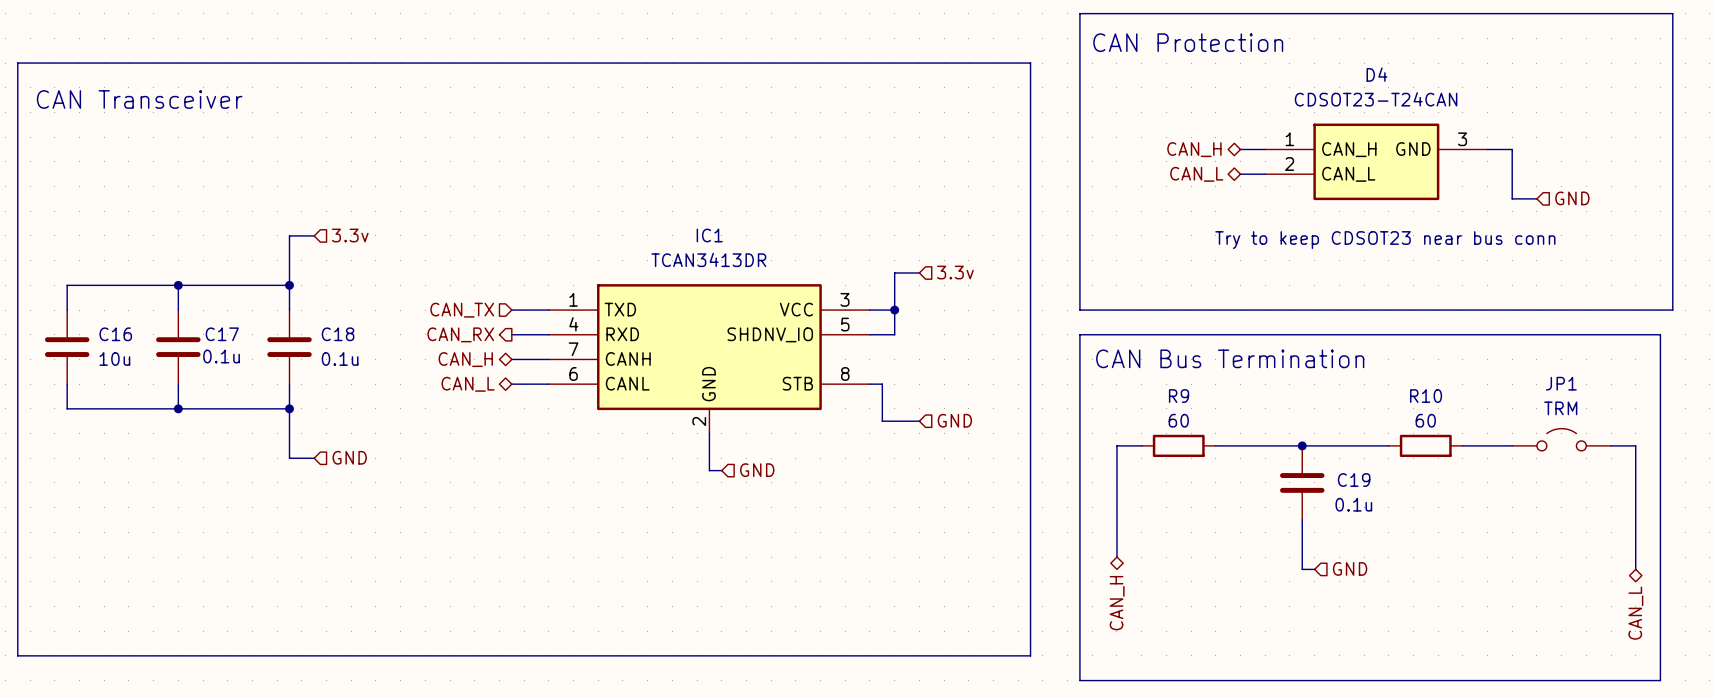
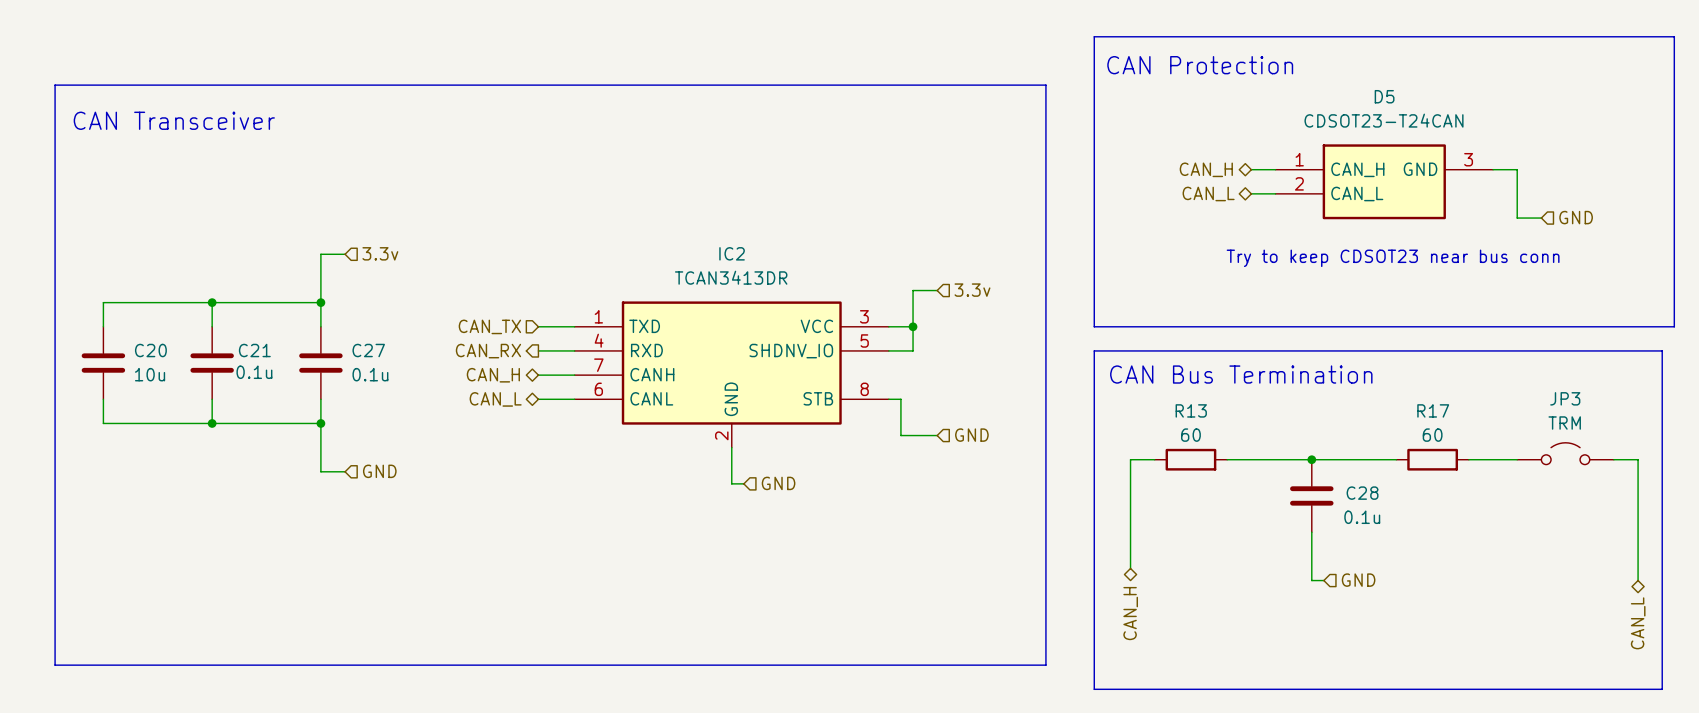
D4 name: D4 (1376, 74) -> D5 (1384, 96)
IC1 name: IC1 (709, 235) -> IC2 (732, 253)
C16 name: C16 (115, 334) -> C20 (150, 350)
C17 name: C17 (222, 334) -> C21 (254, 350)
C18 name: C18 (338, 334) -> C27 (368, 350)
JP1 name: JP1 (1561, 383) -> JP3 (1565, 398)
R9 name: R9 (1179, 396) -> R13 (1191, 410)
R10 name: R10 (1426, 396) -> R17 (1433, 410)
C19 name: C19 (1354, 480) -> C28 (1362, 493)

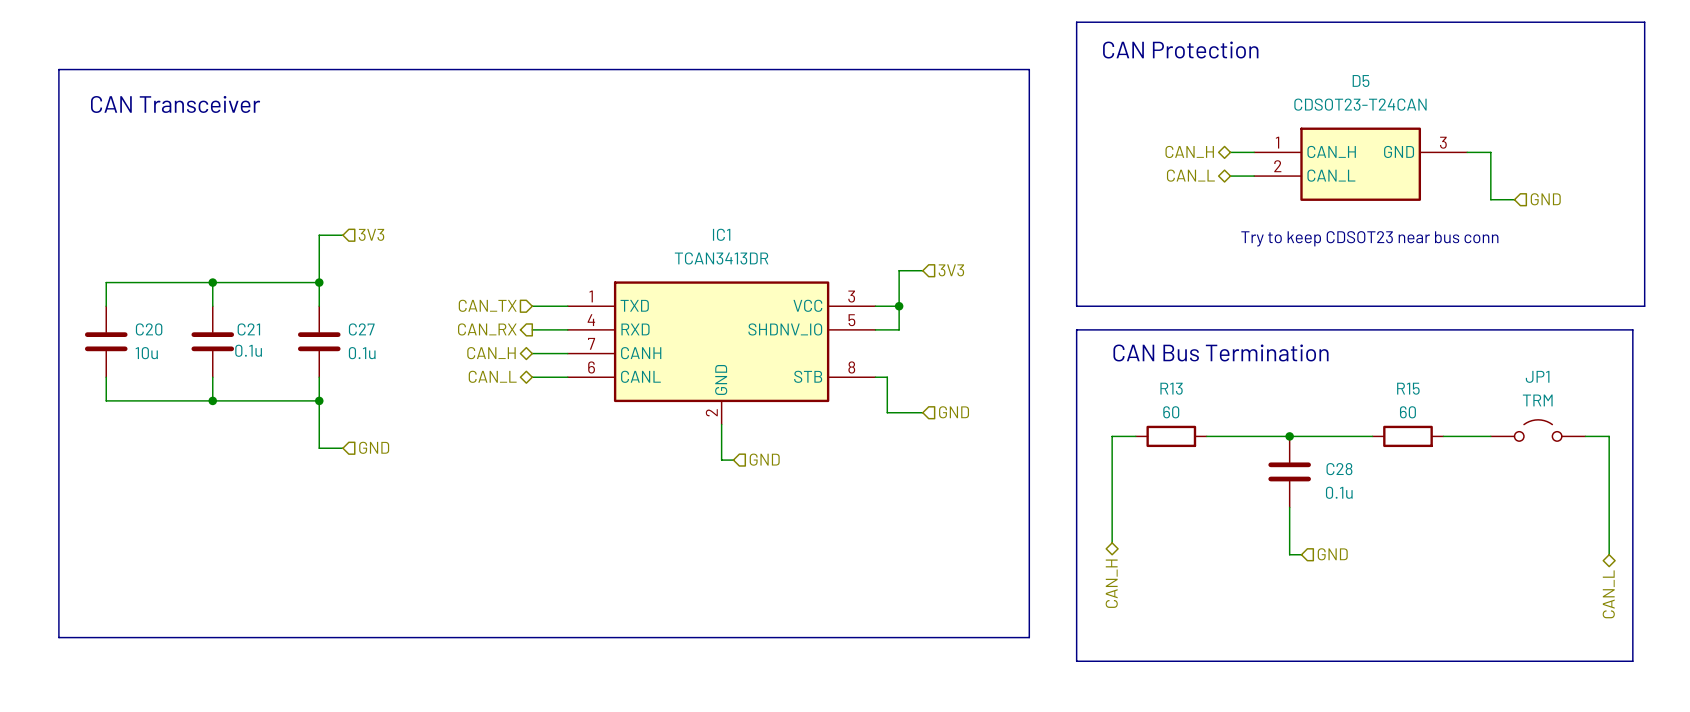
hierarchical label: 3.3v (380, 253) -> 3V3 (371, 234)
IC2 name: IC2 (732, 253) -> IC1 (721, 234)
hierarchical label: 3.3v (972, 290) -> 3V3 (951, 270)
JP3 name: JP3 (1565, 398) -> JP1 (1537, 376)
R17 name: R17 (1433, 410) -> R15 (1408, 388)

